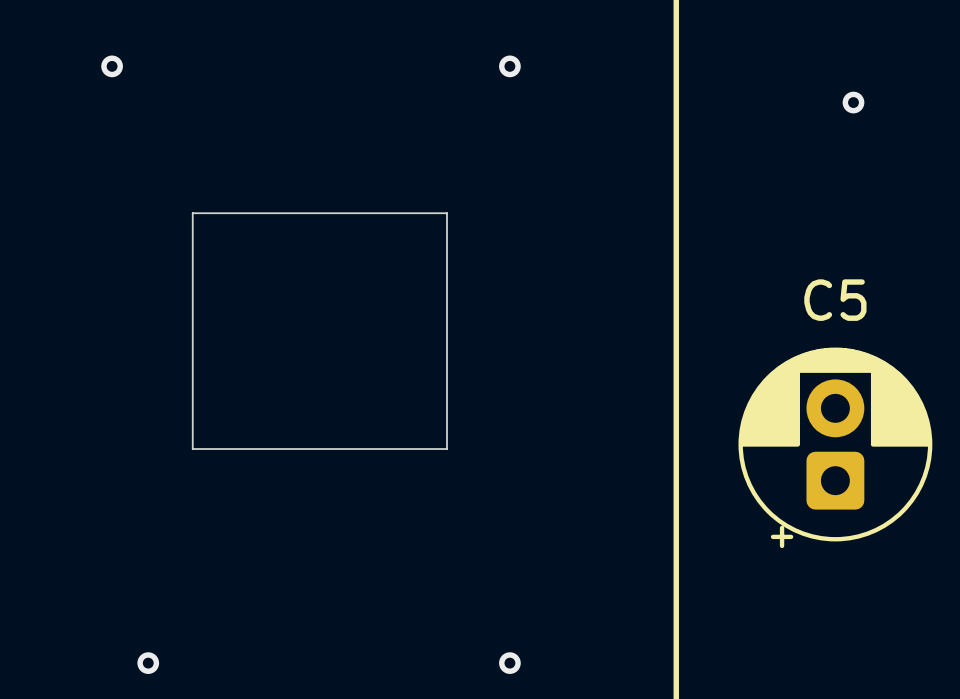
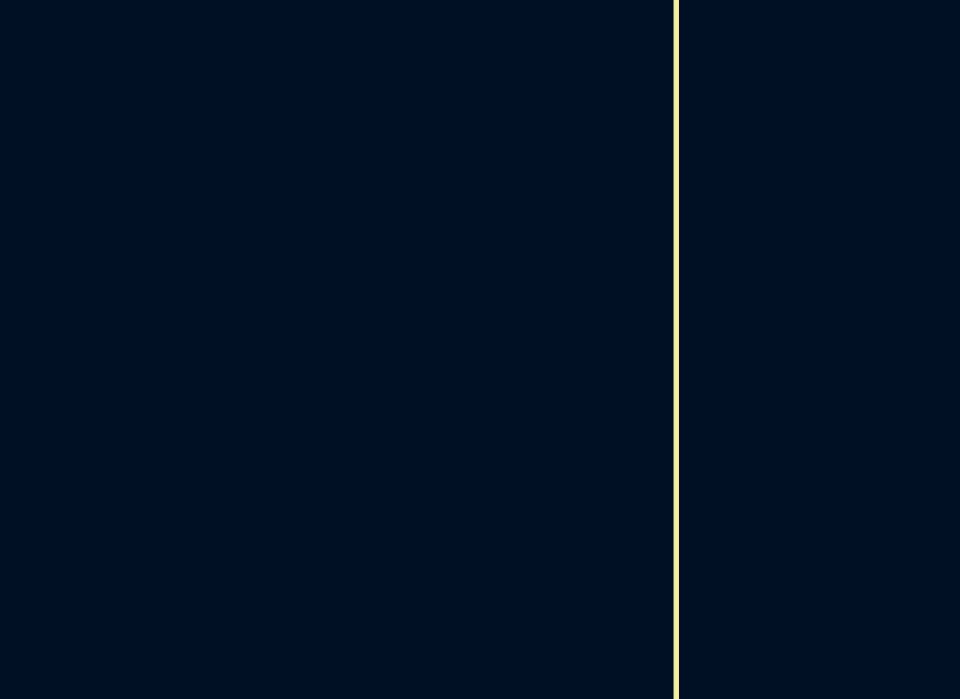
via: (112, 66) -> none
via: (509, 66) -> none
via: (853, 102) -> none
board edge: (192, 213) (446, 213) (446, 449) (192, 449) (192, 213) -> none
C5: (835, 447) -> none
via: (148, 663) -> none
via: (509, 663) -> none

